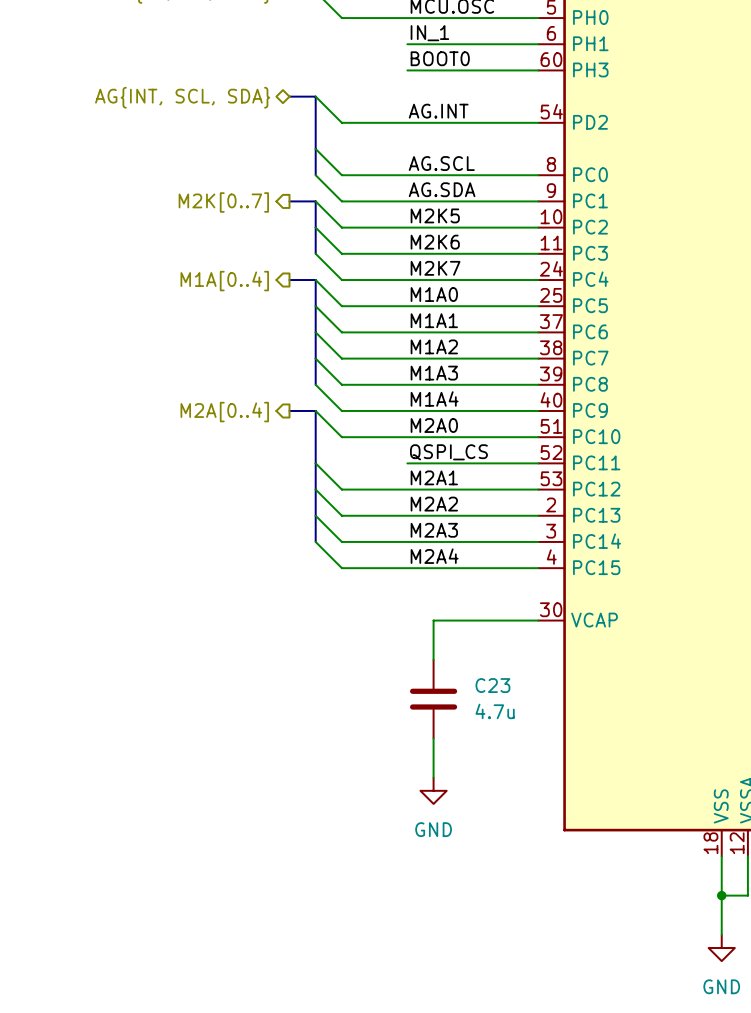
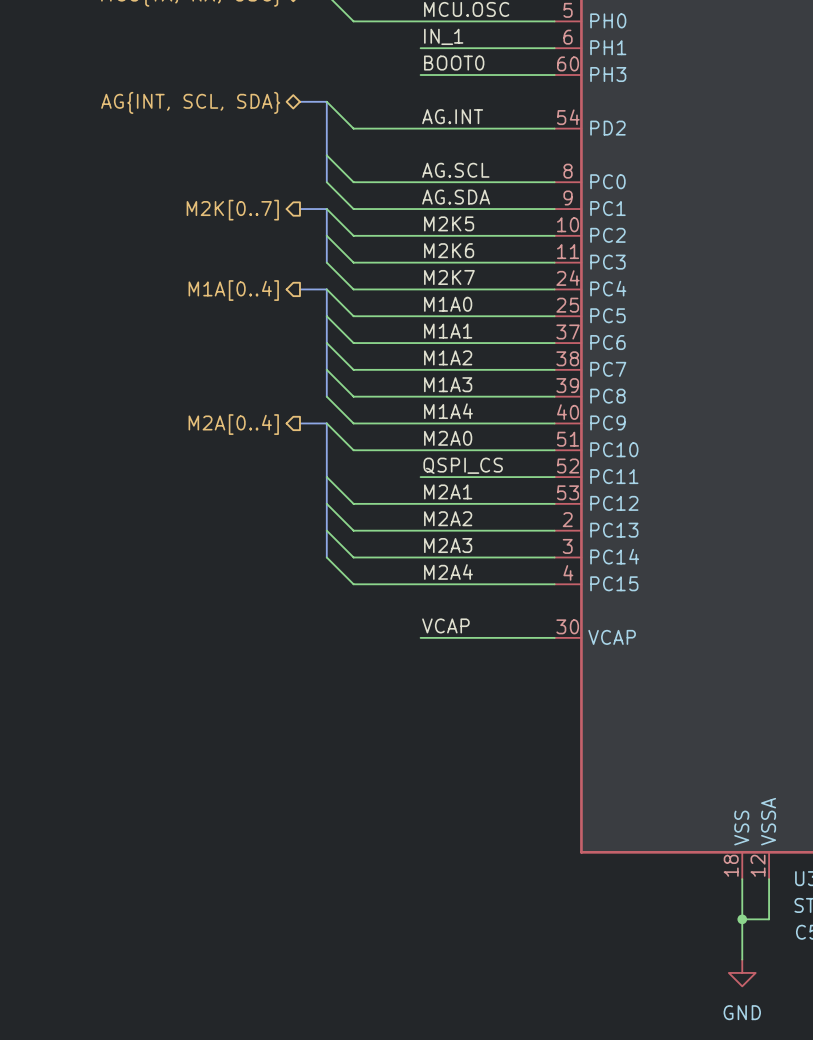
label: none -> VCAP (445, 625)
wire: (433, 620) (433, 659) -> (447, 637) (420, 637)
C23: 4.7u (433, 699) -> none
wire: (433, 738) (433, 777) -> none
power symbol: GND (433, 790) -> none

